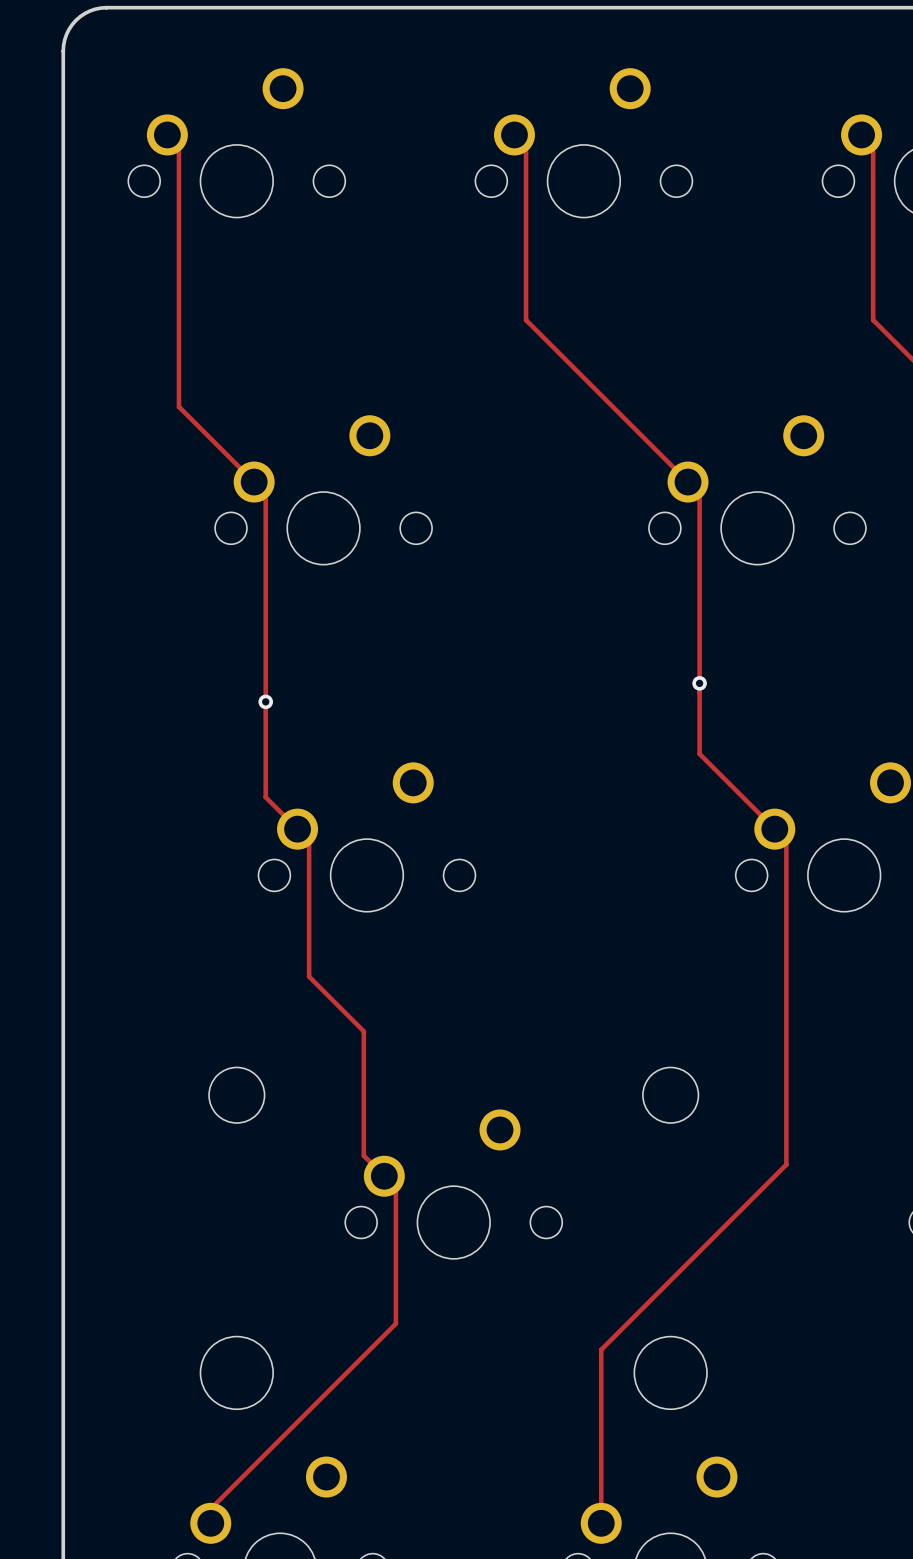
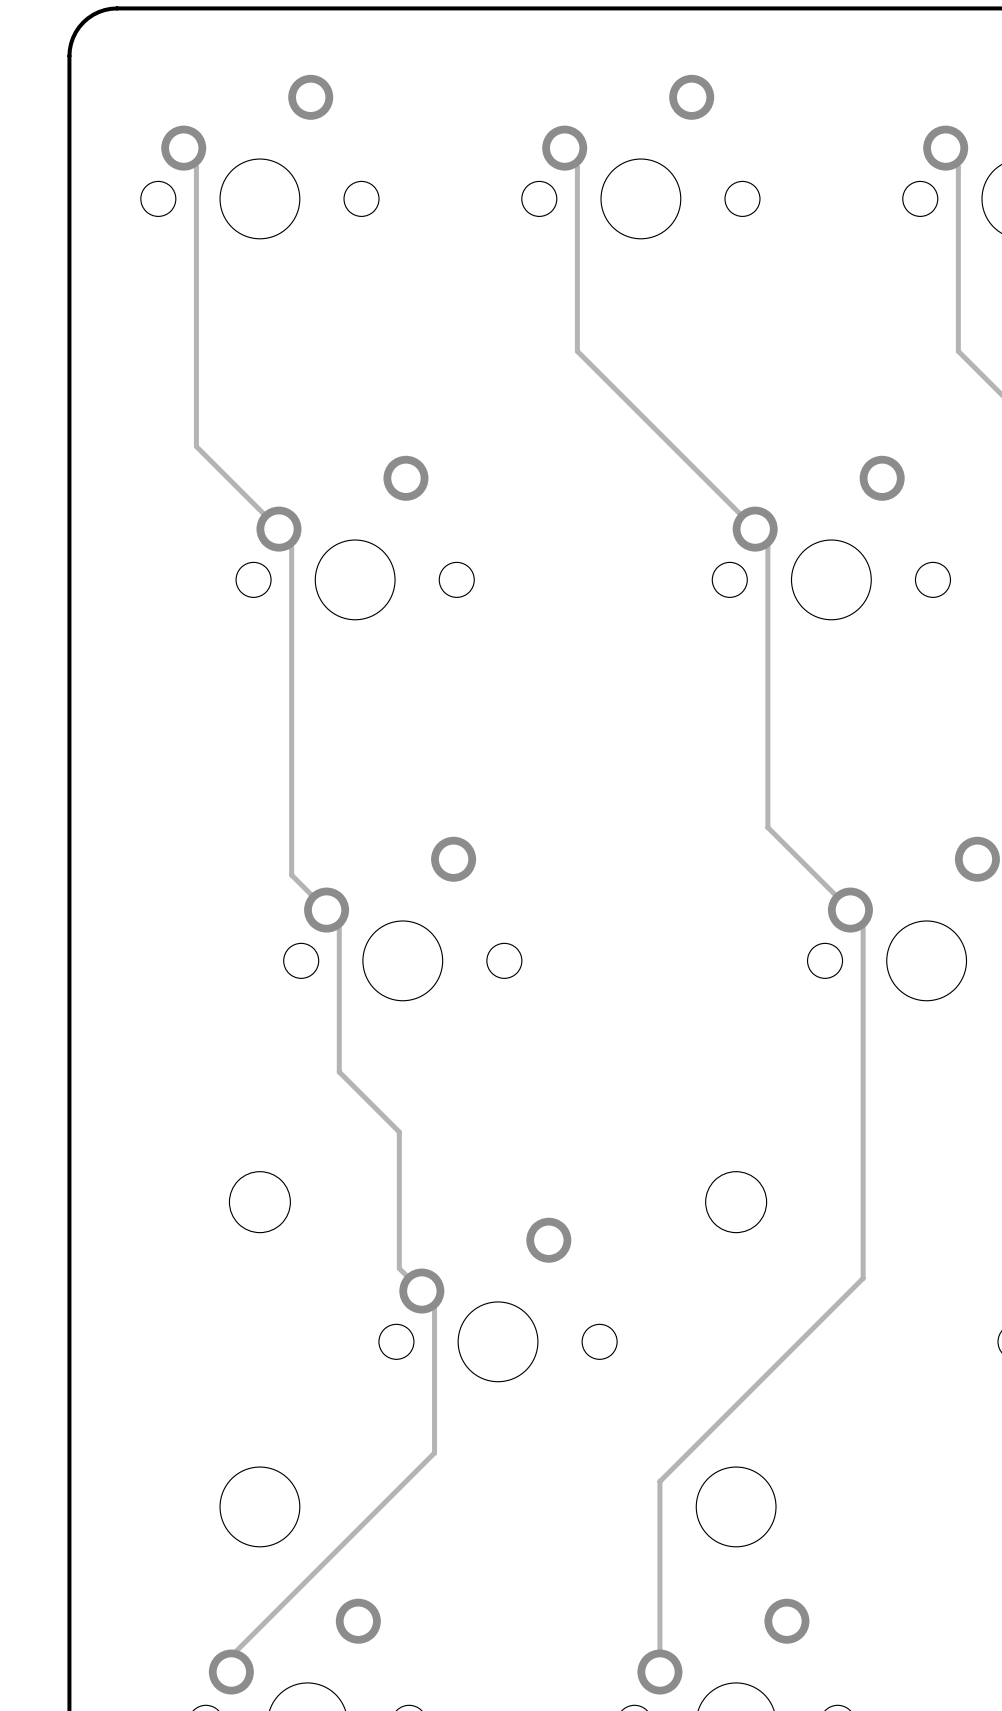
via: (699, 683) -> none
via: (265, 701) -> none

